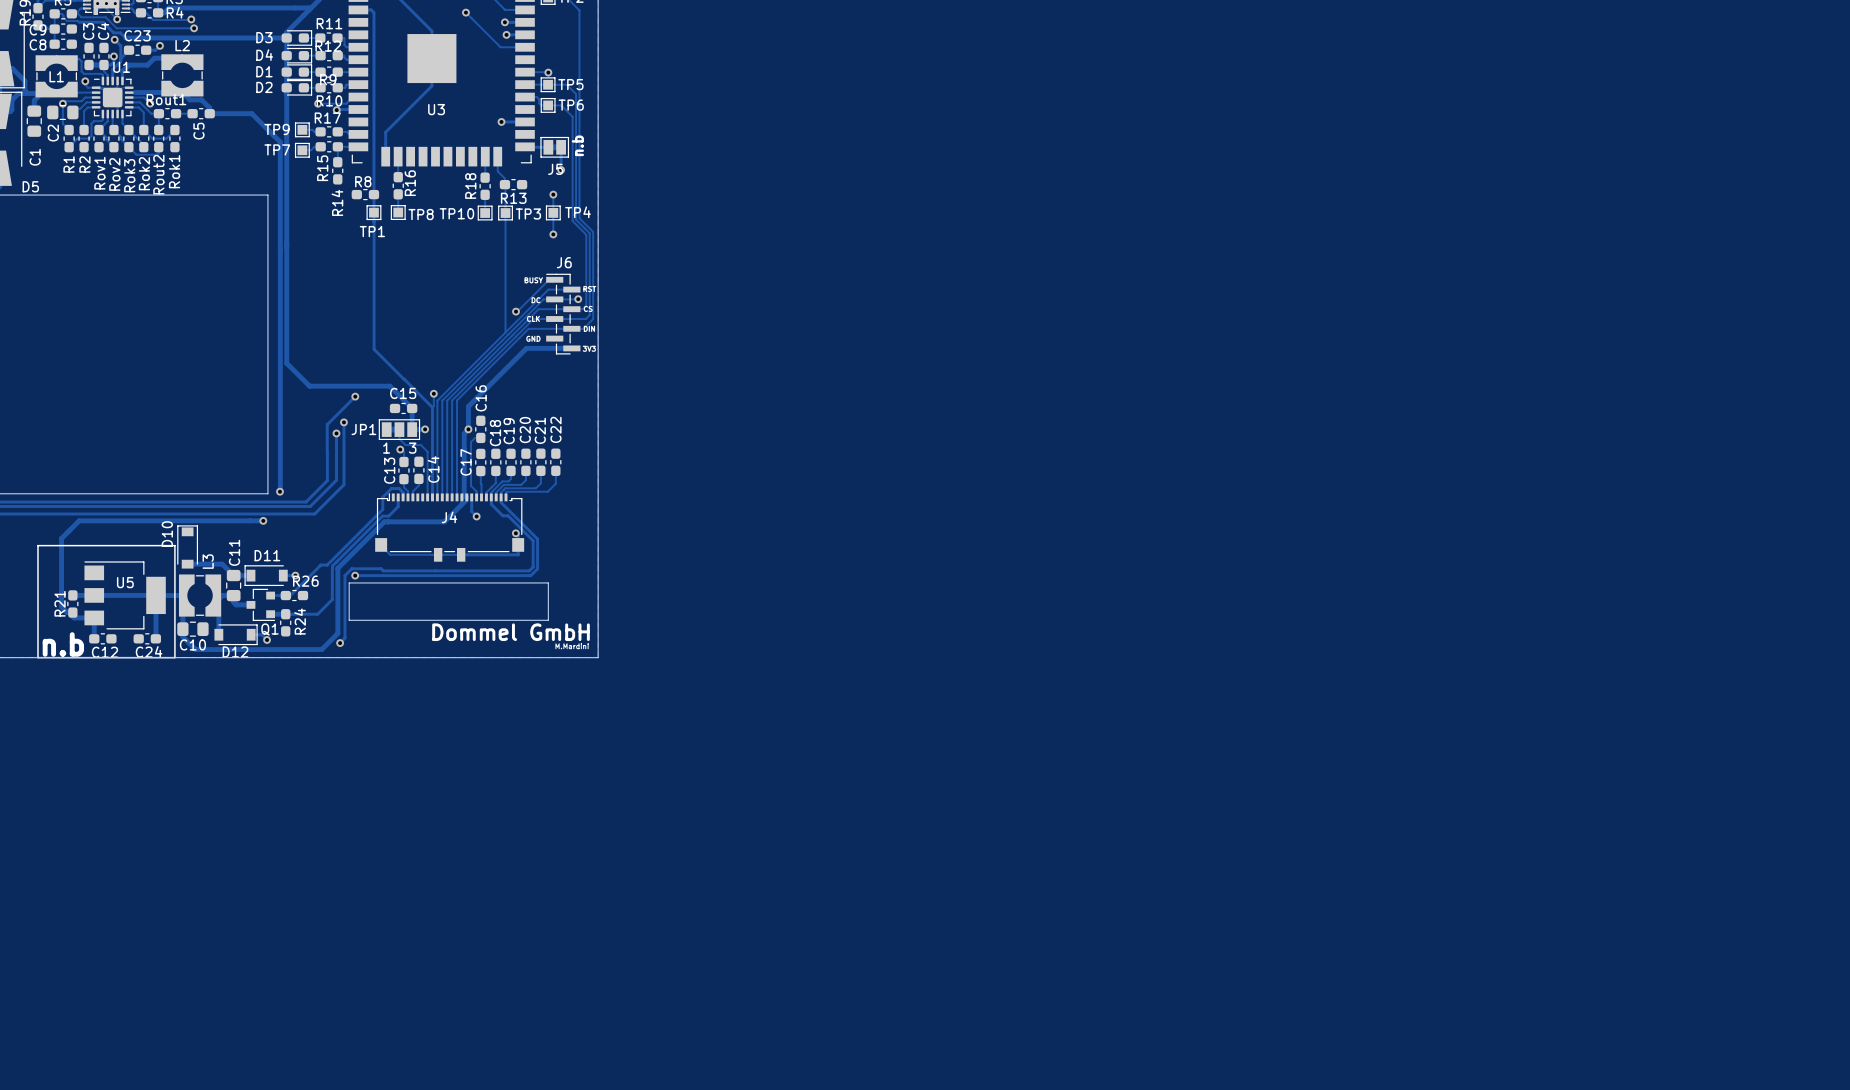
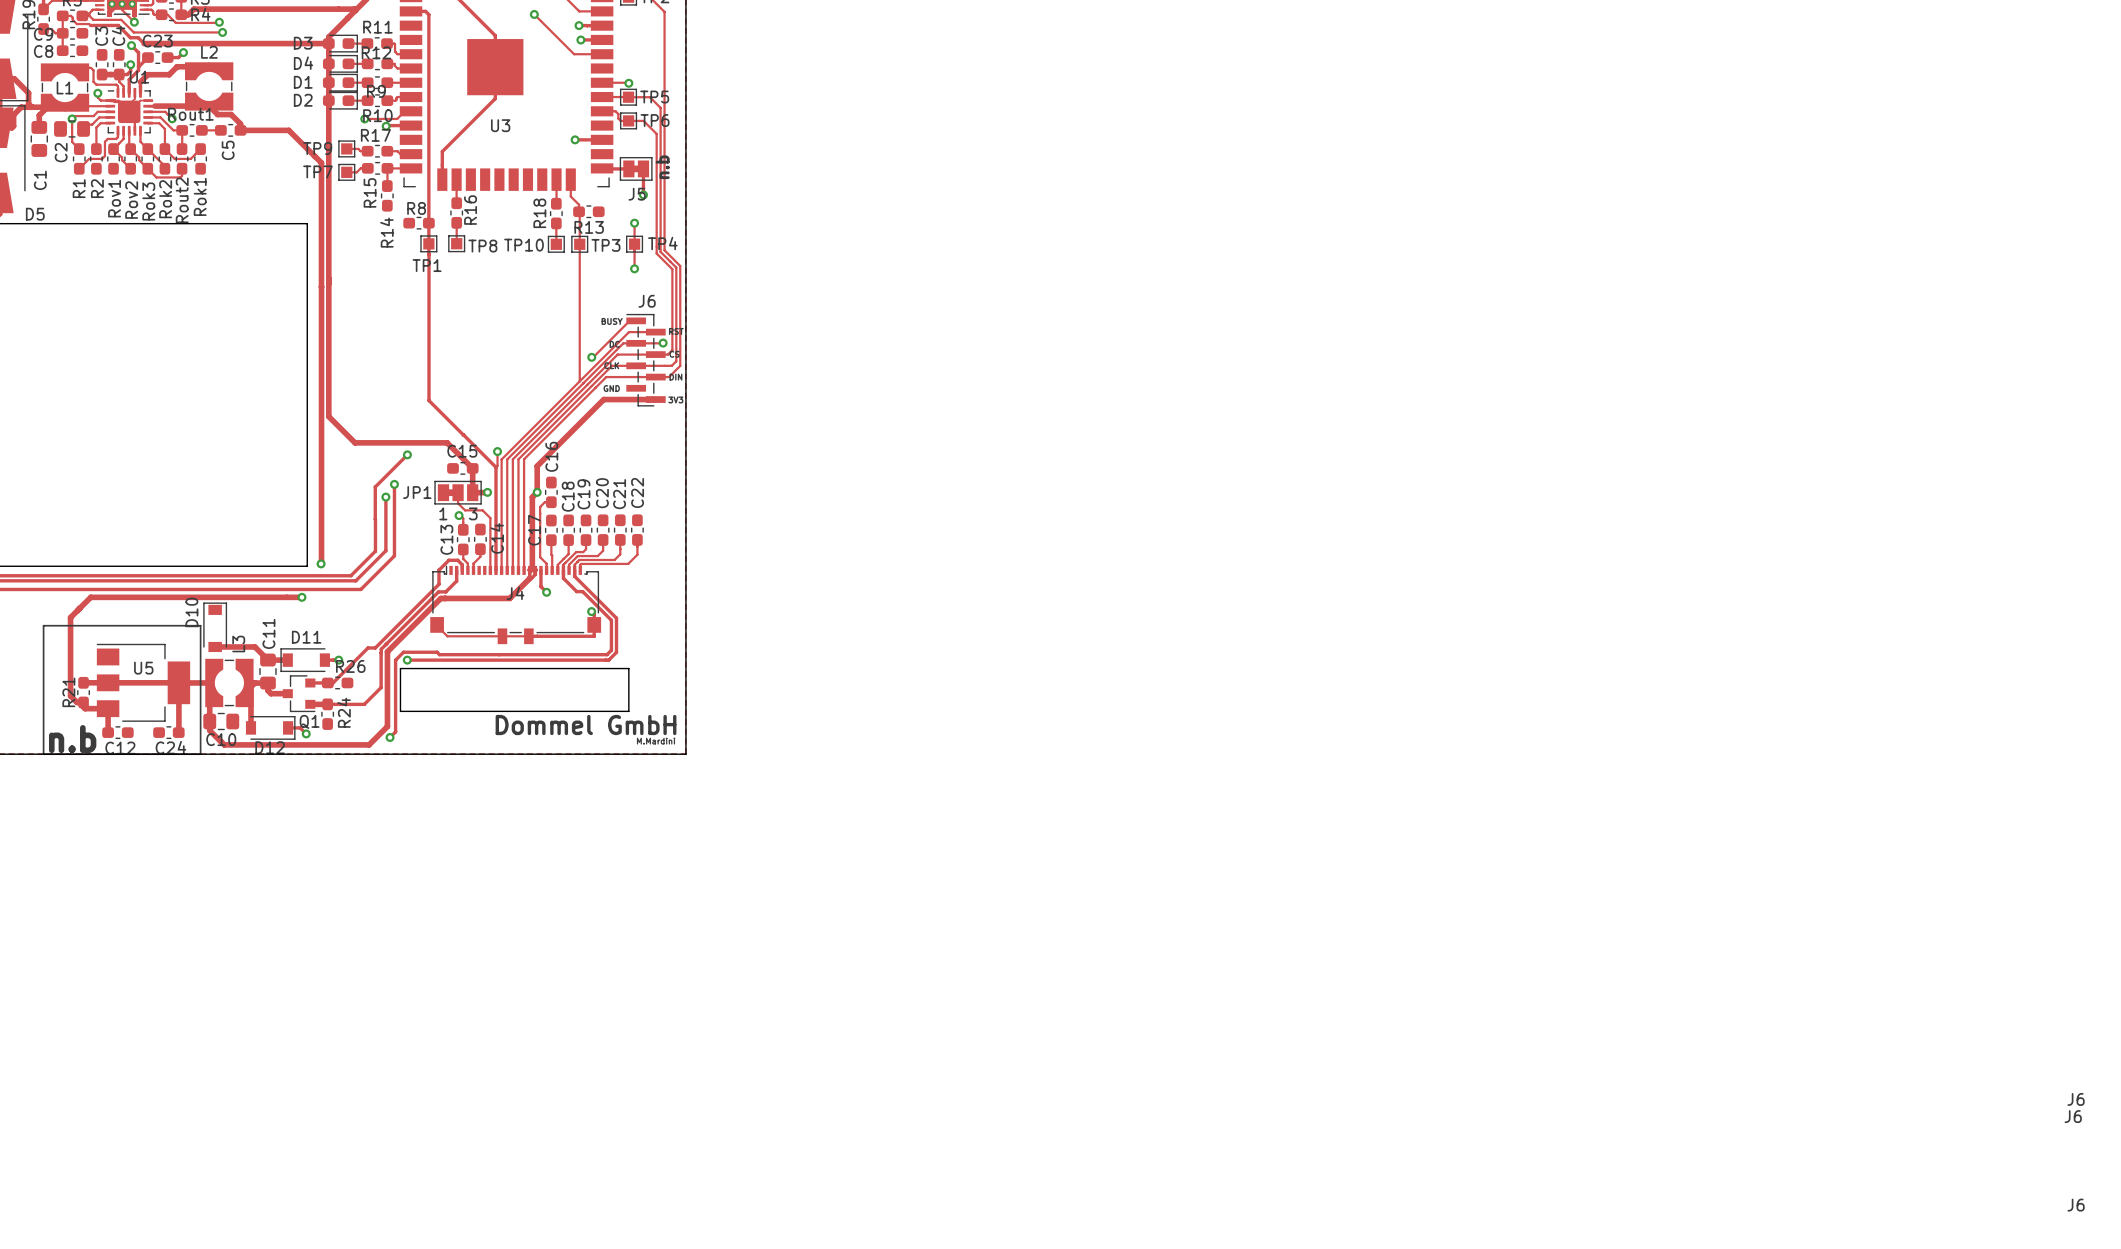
drawing: none -> [2064, 1092, 2085, 1124]
drawing: none -> [2067, 1198, 2085, 1212]

